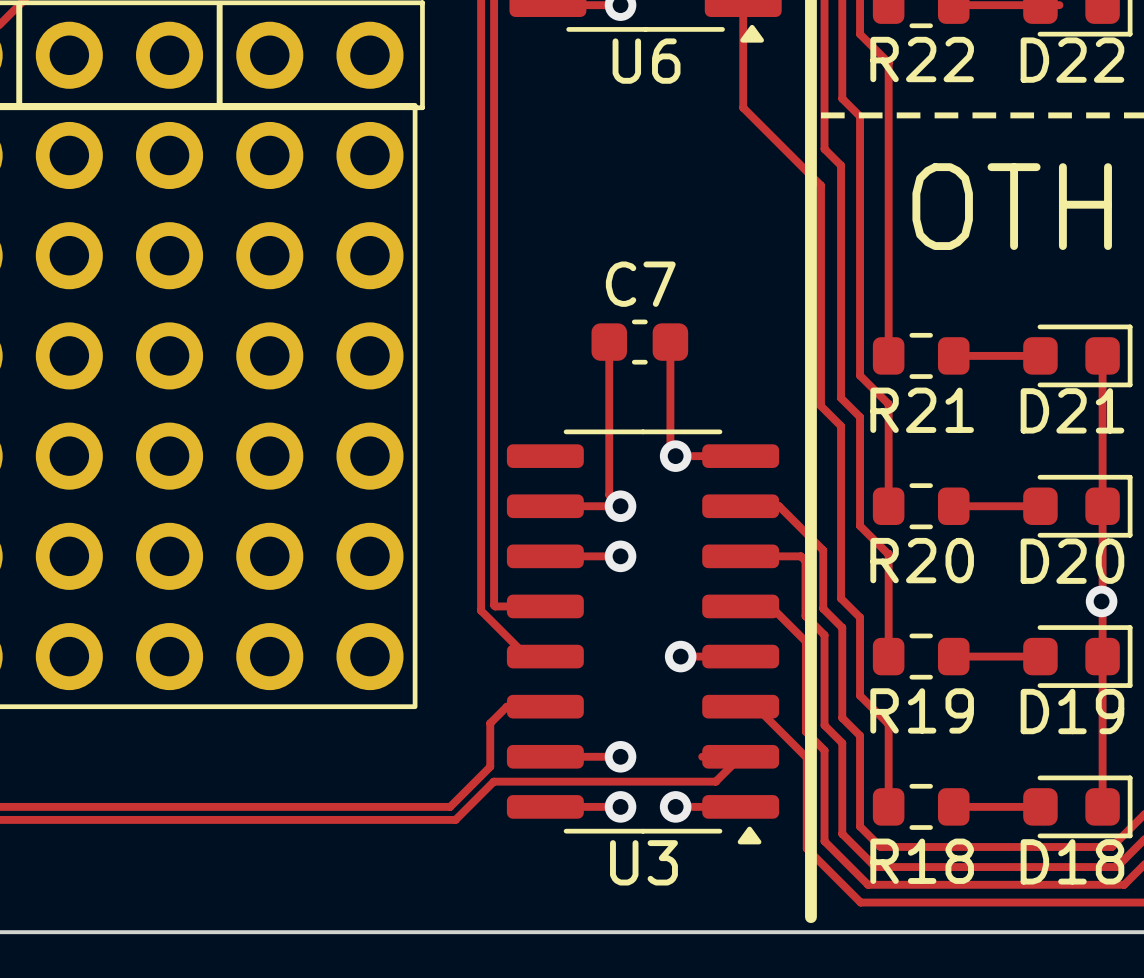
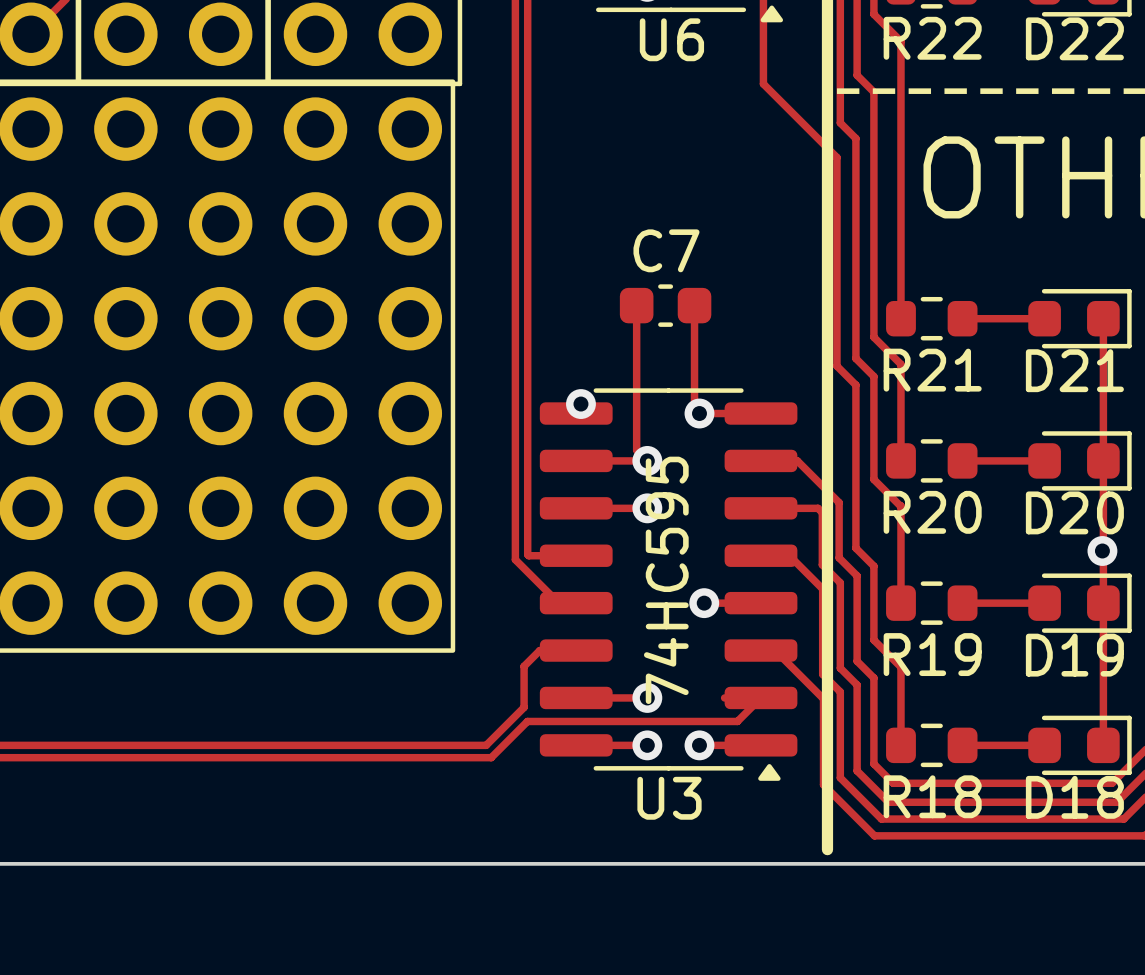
via: none -> (580, 404)
text: none -> 74HC595 (666, 580)

